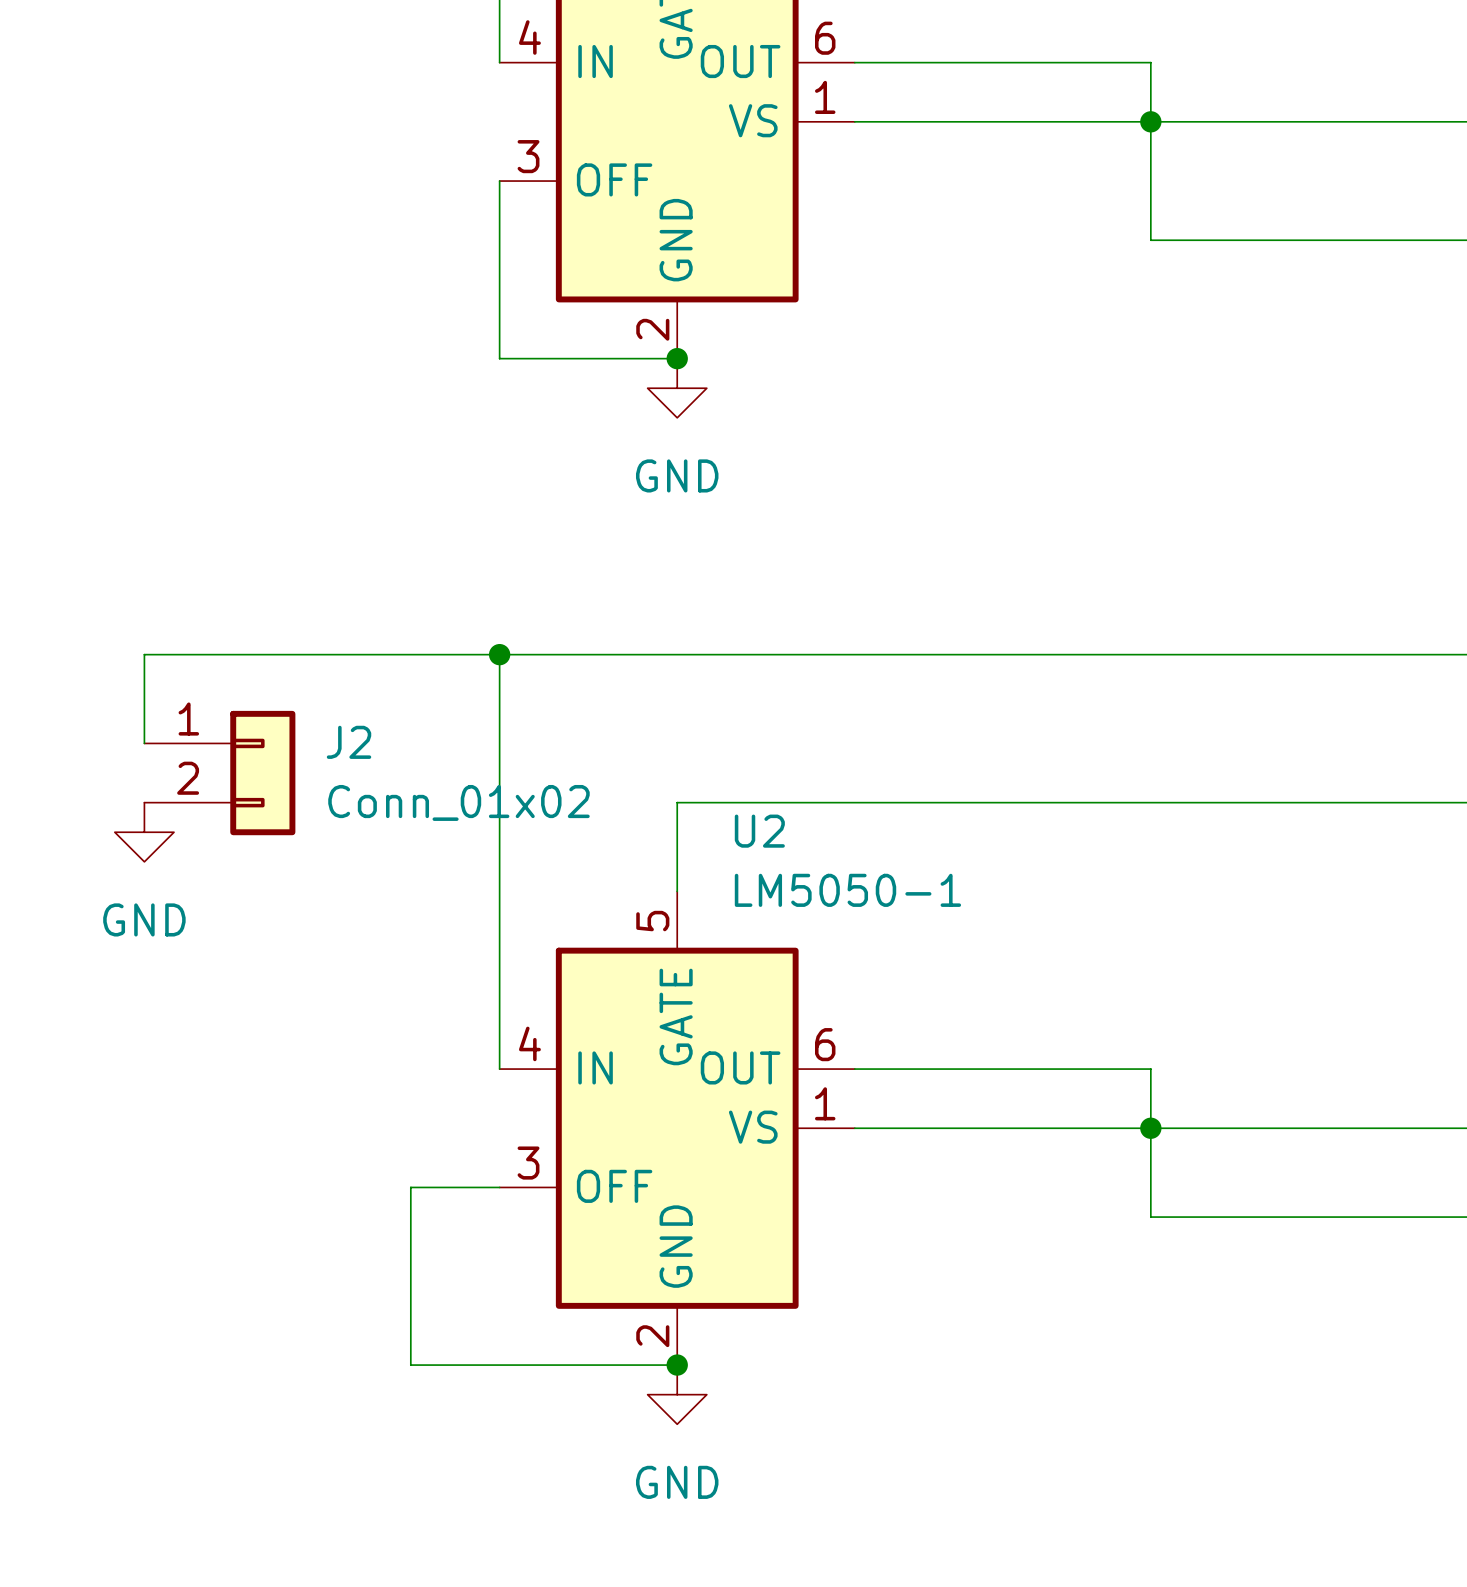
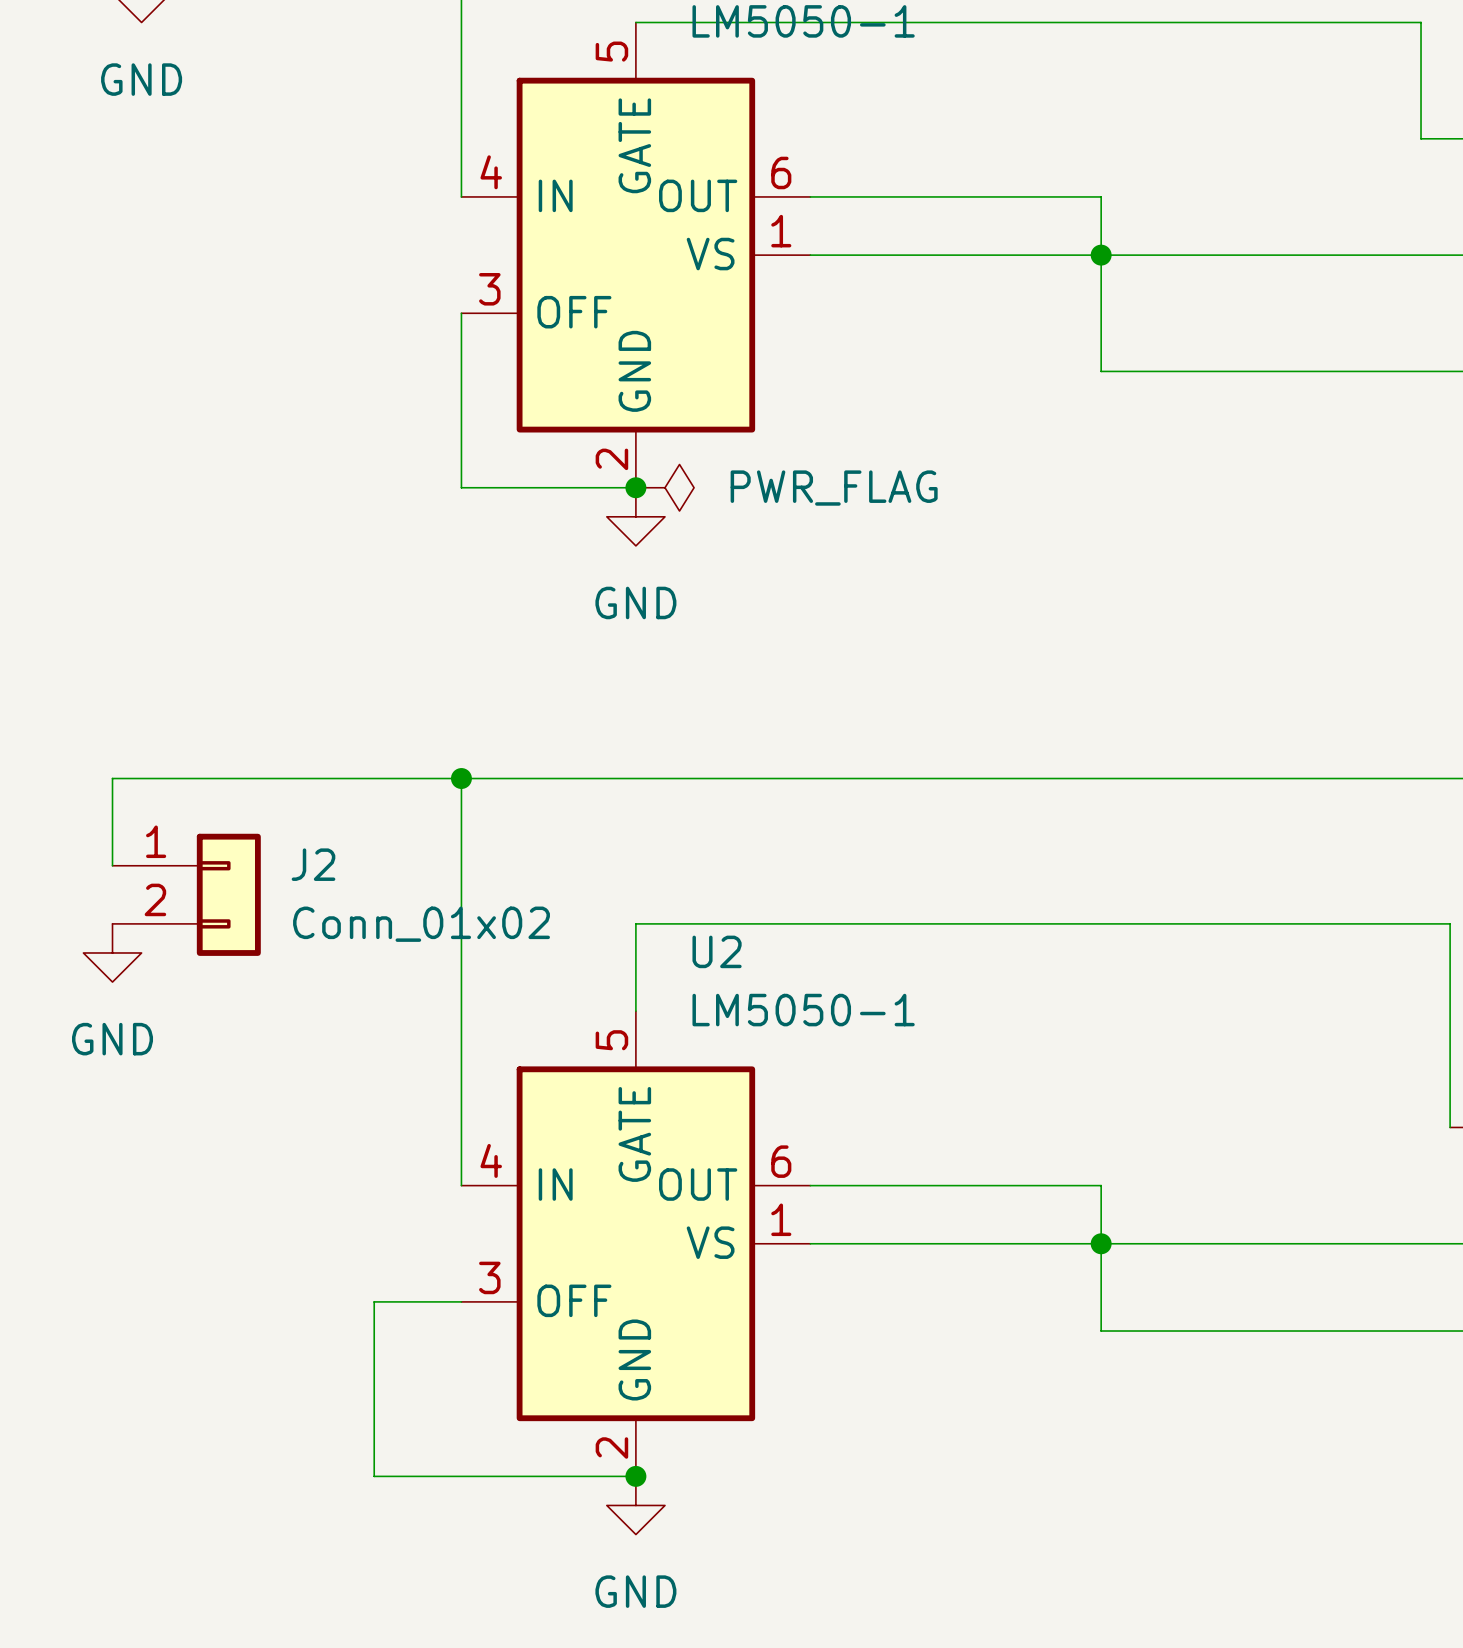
power symbol: none -> PWR_FLAG (664, 487)

